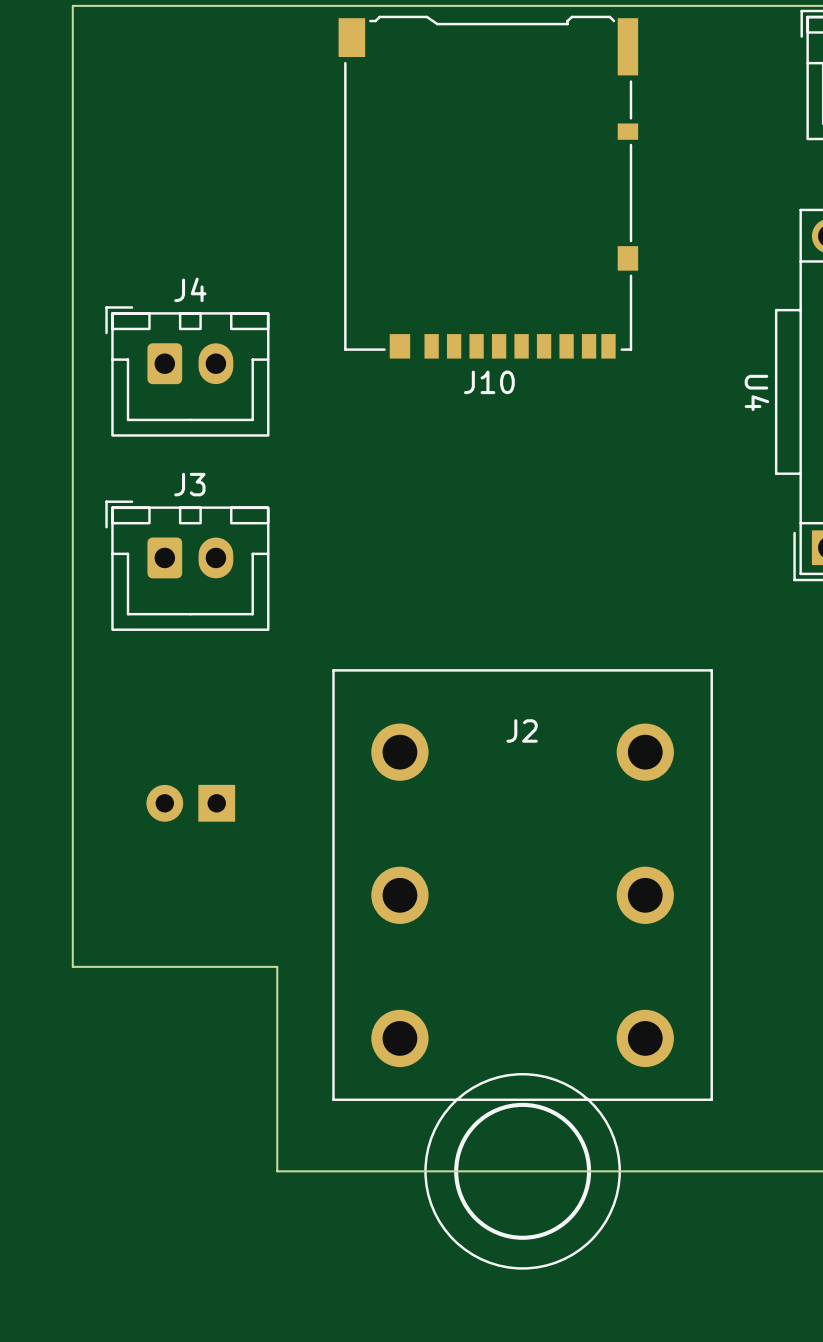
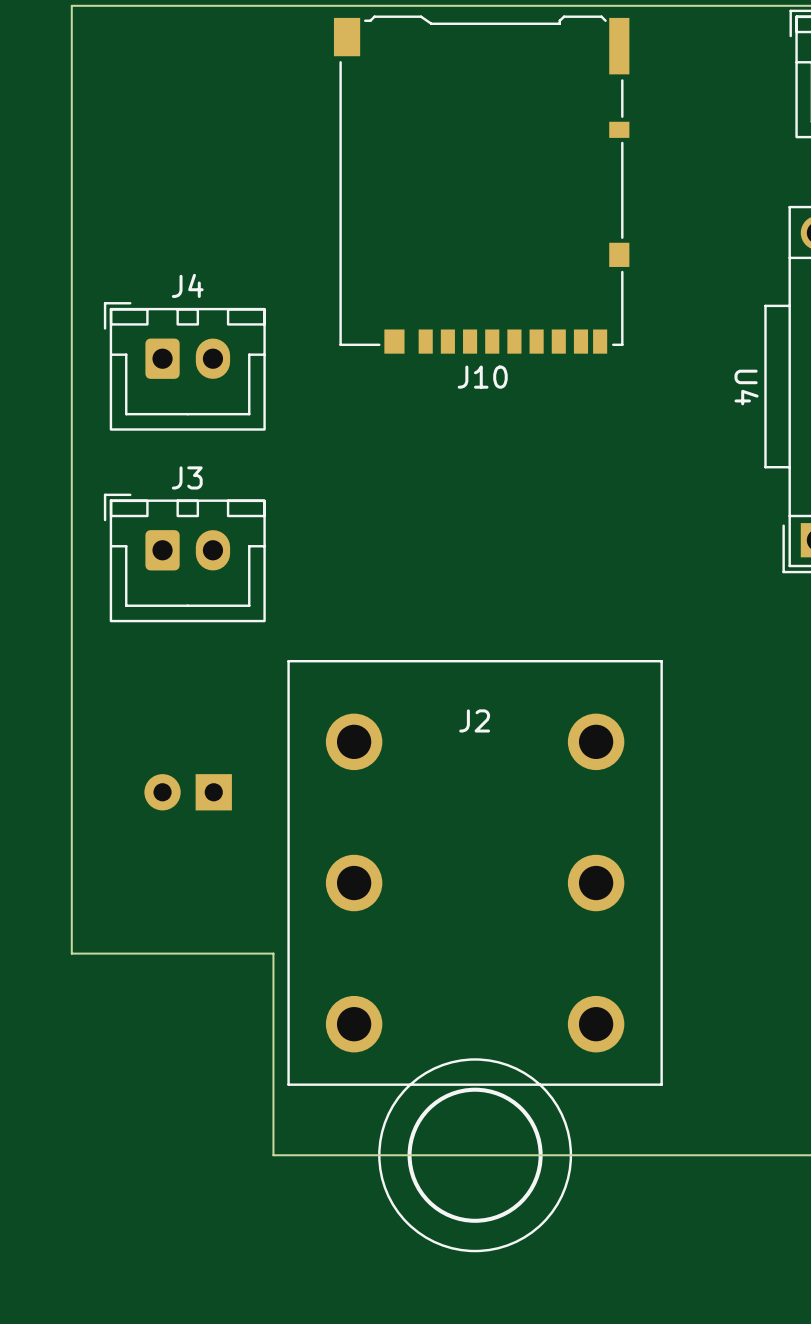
J2 position: (522, 969) -> (475, 956)

